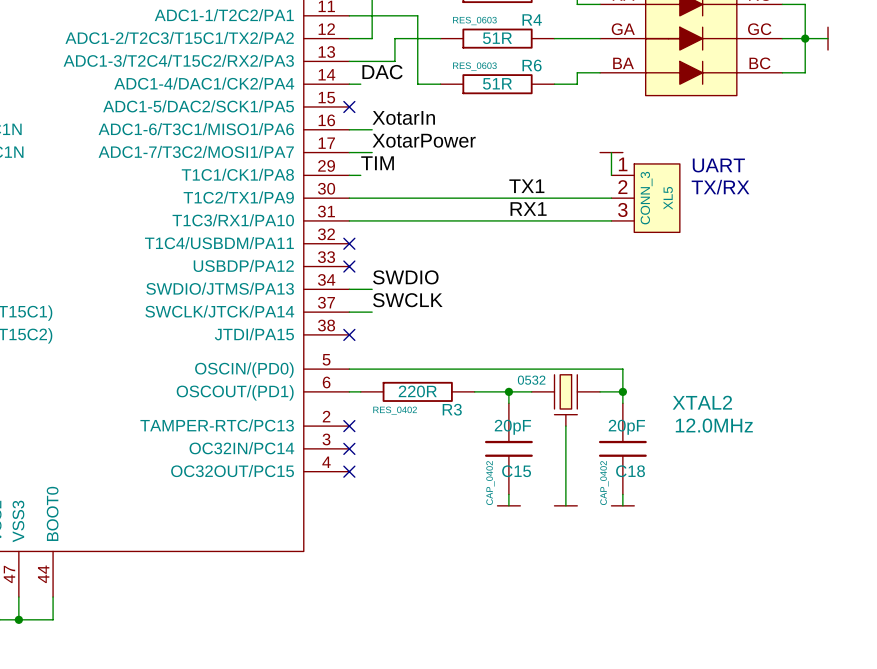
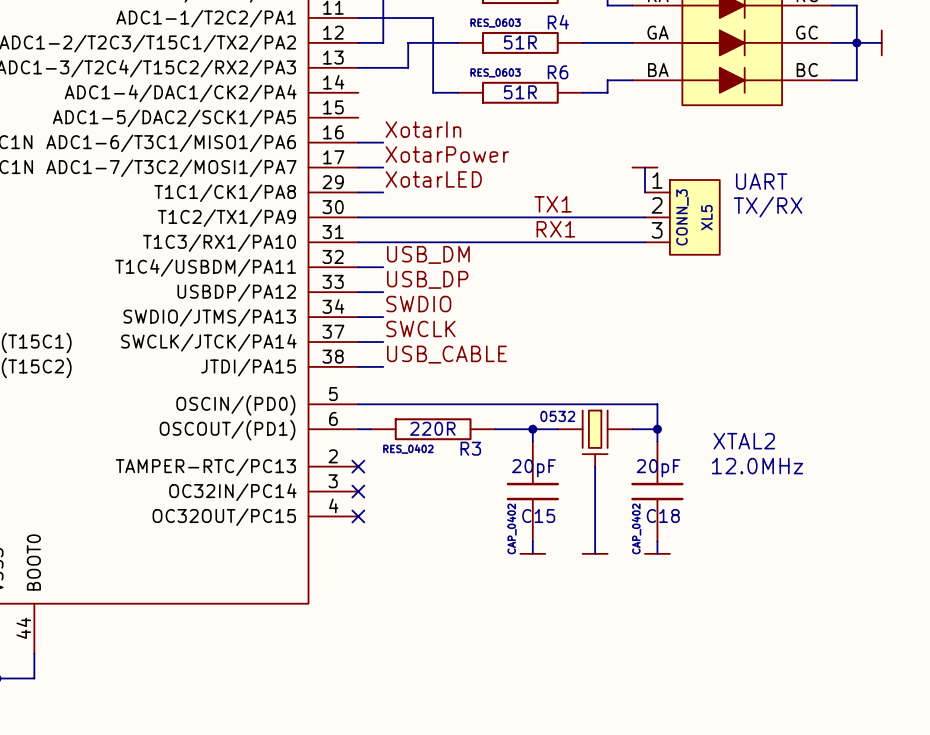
label: DAC (382, 72) -> none
wire: (349, 84) (360, 84) -> (370, 192) (383, 192)
no-connect mark: (349, 106) -> none
label: TIM (377, 163) -> none
label: none -> XotarLED (433, 179)
label: none -> USB_DM (428, 254)
wire: none -> (358, 267) (383, 267)
no-connect mark: (349, 243) -> none
label: none -> USB_DP (427, 279)
wire: none -> (358, 292) (383, 292)
no-connect mark: (349, 266) -> none
label: none -> USB_CABLE (446, 354)
wire: none -> (358, 366) (383, 366)
no-connect mark: (349, 334) -> none

